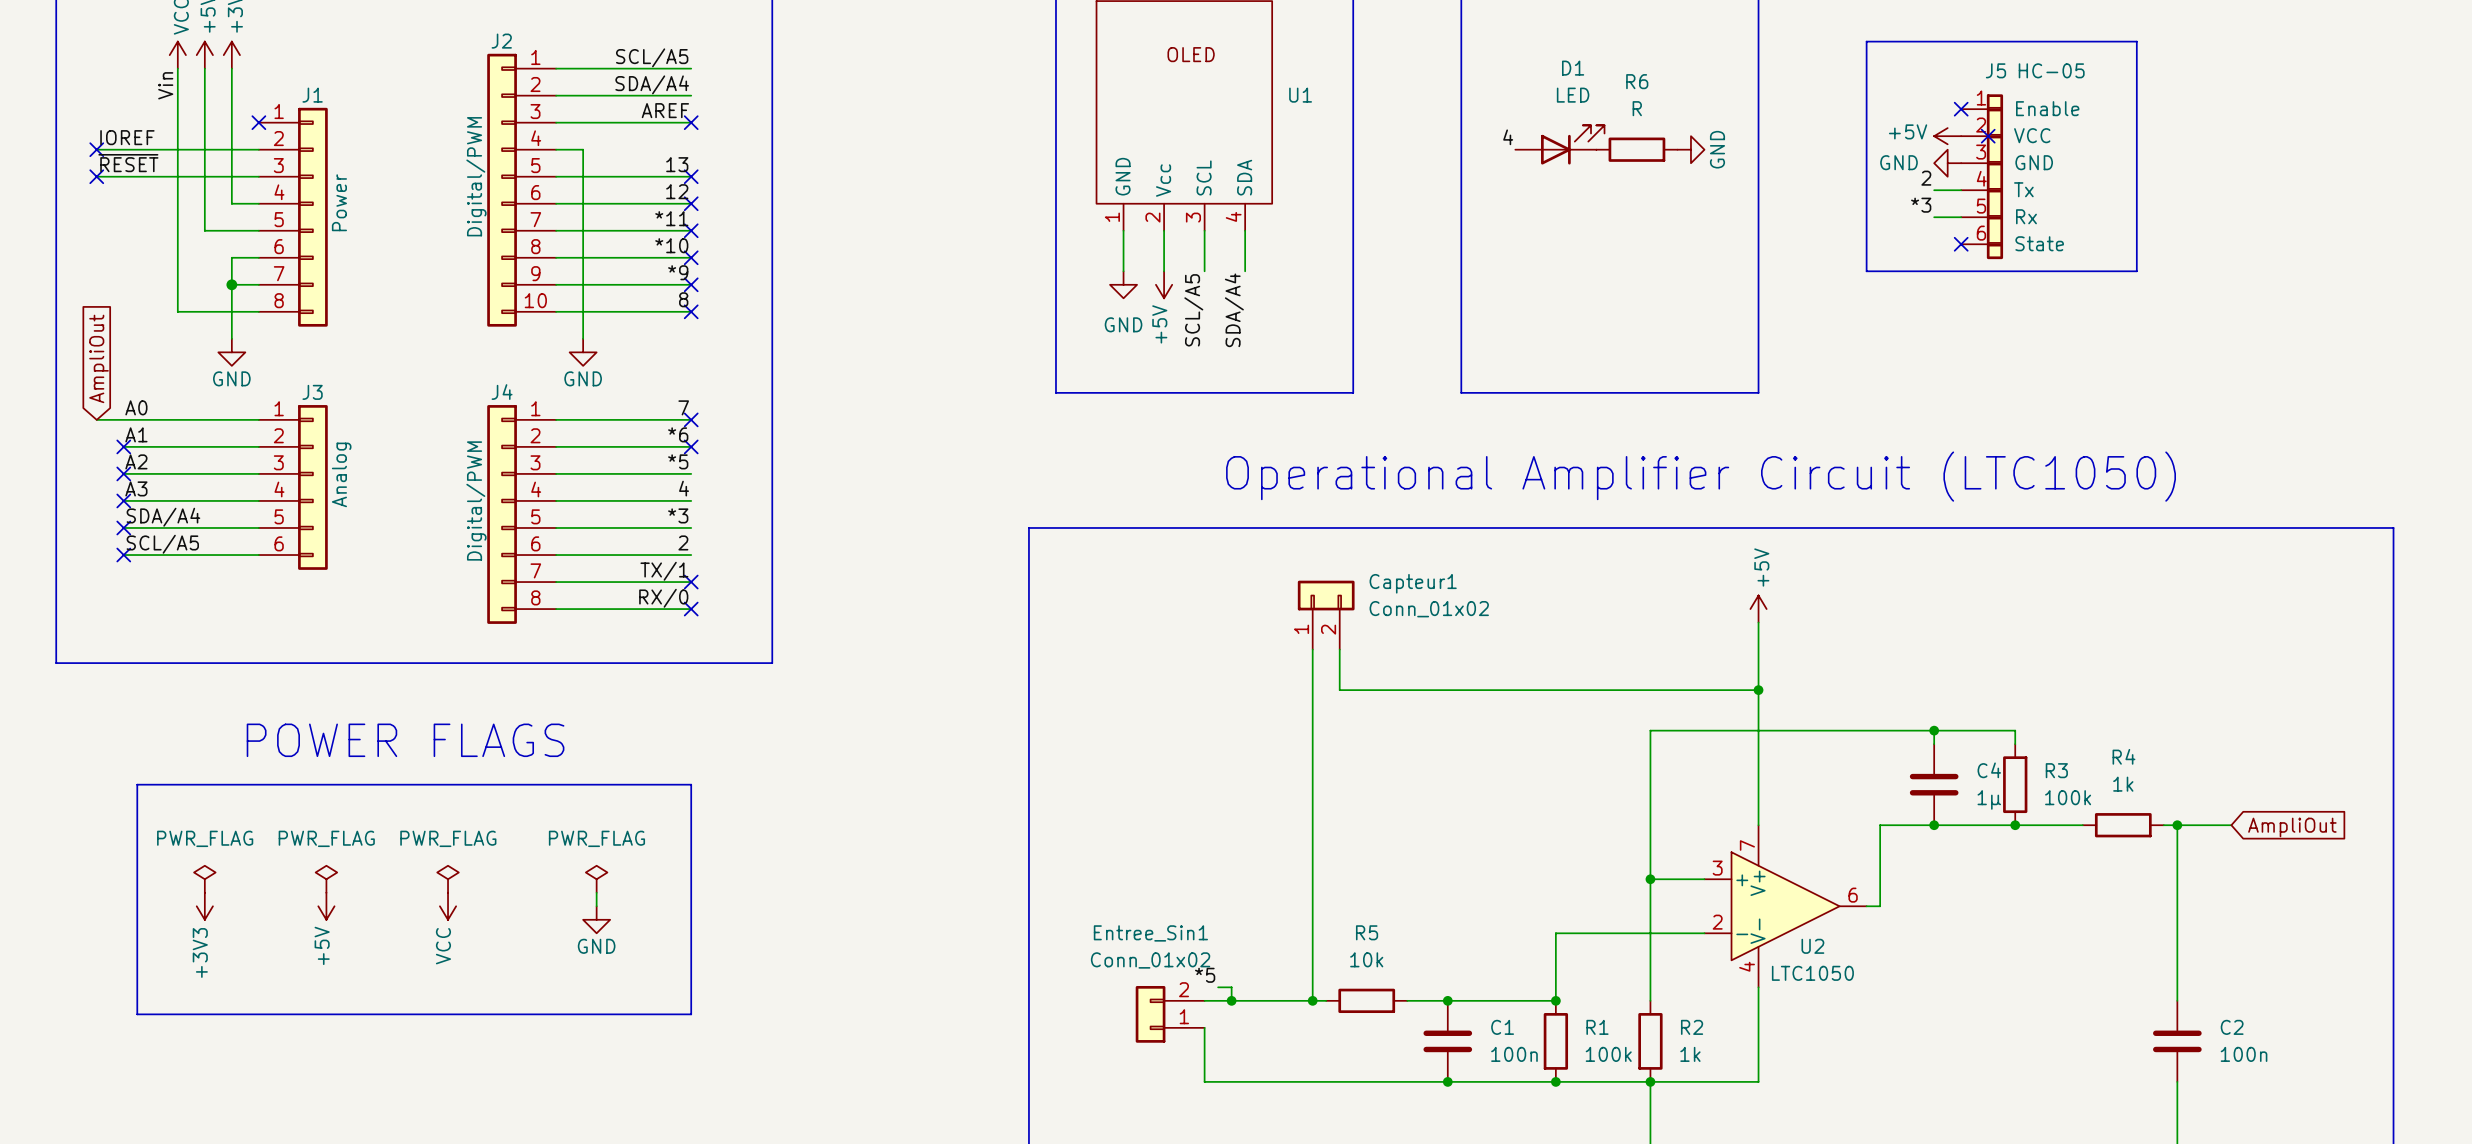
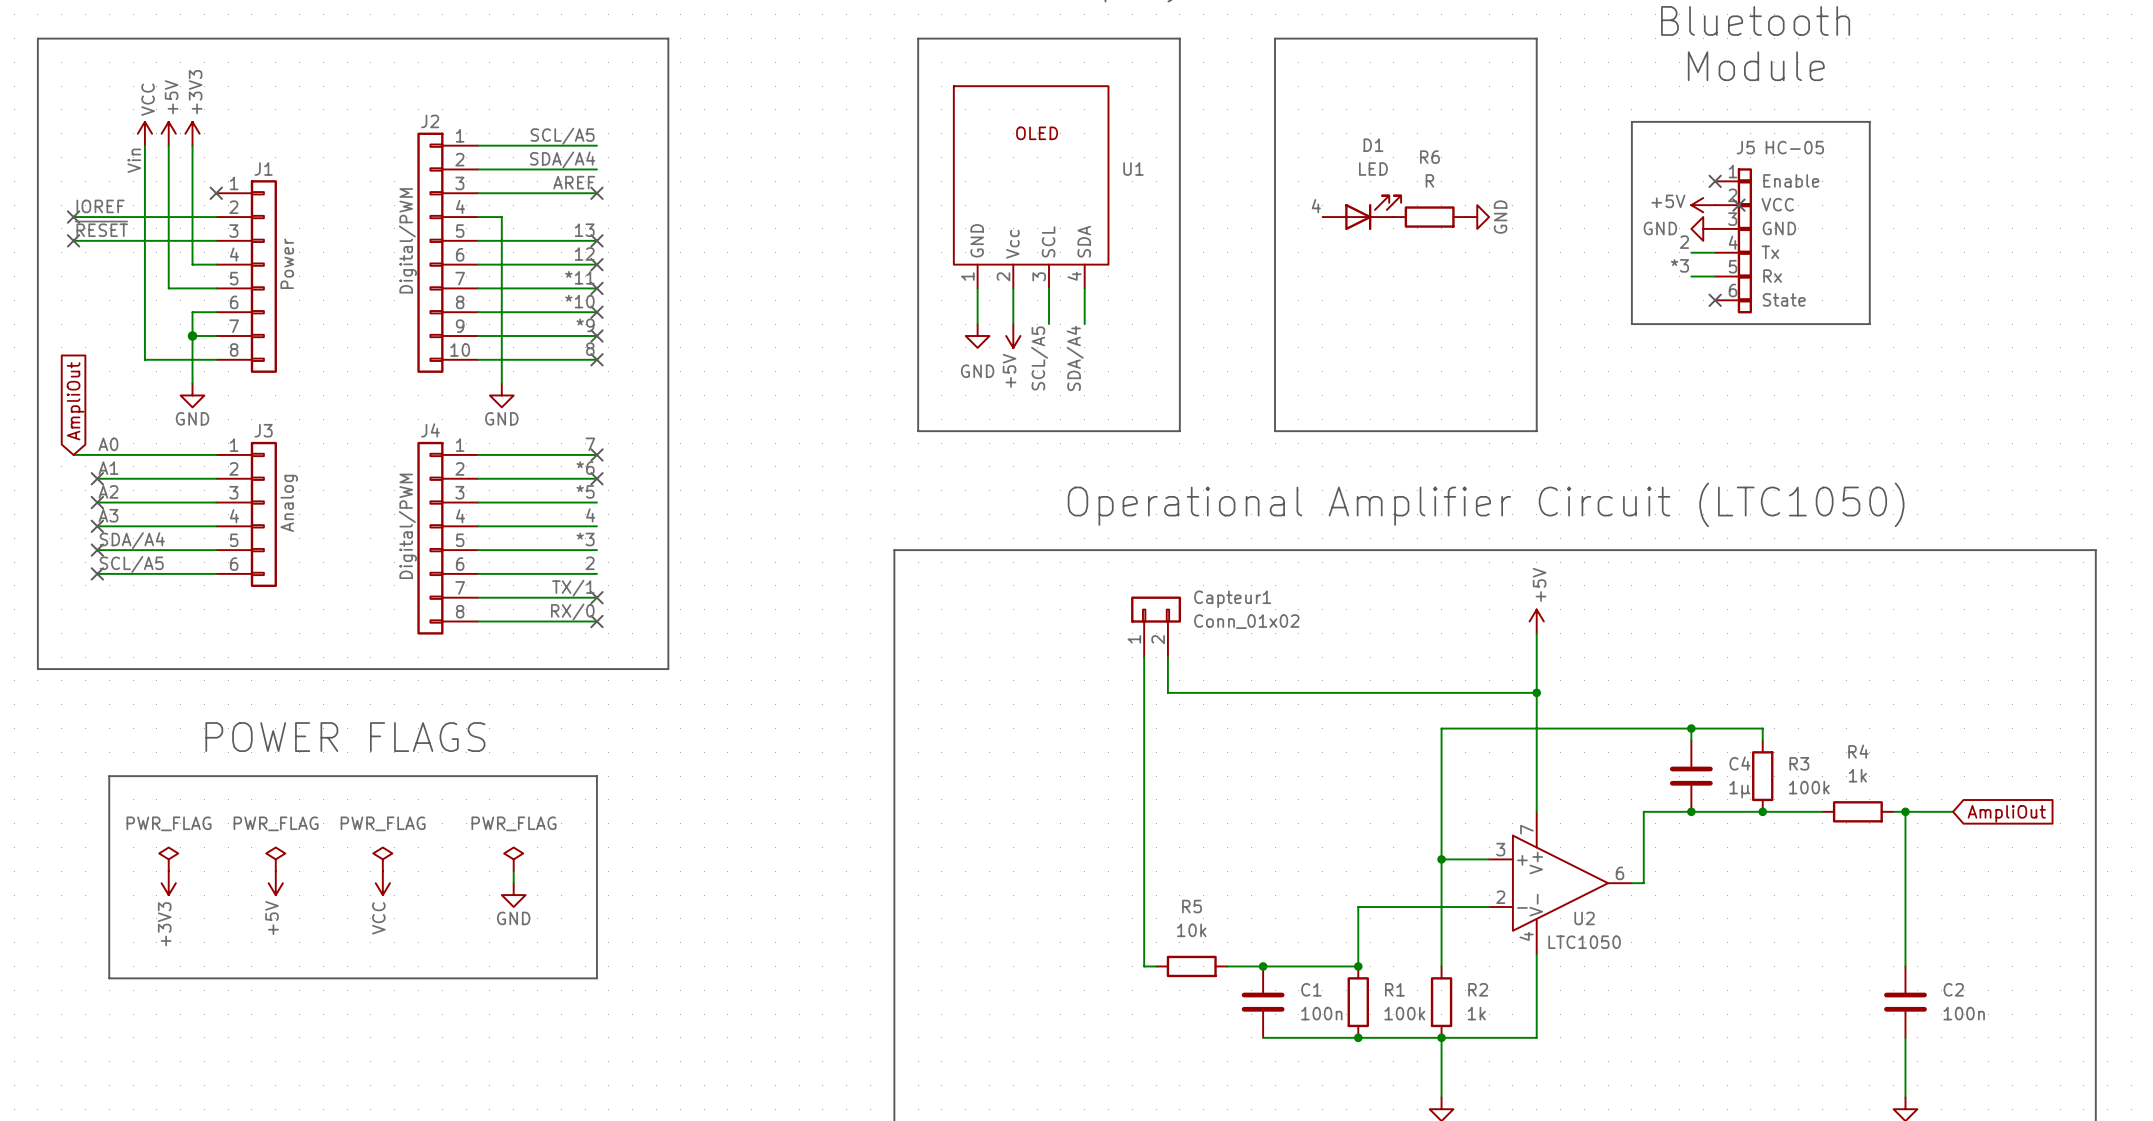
label: *5 (1205, 975) -> none
wire: (1218, 987) (1231, 987) (1231, 1000) -> none
wire: (1204, 1000) (1312, 1000) -> none
junction: (1231, 1000) -> none
junction: (1312, 1000) -> none
Entree_Sin1: Conn_01x02 (1170, 1014) -> none
wire: (1204, 1027) (1204, 1081) (1447, 1081) -> none
junction: (1447, 1081) -> none

